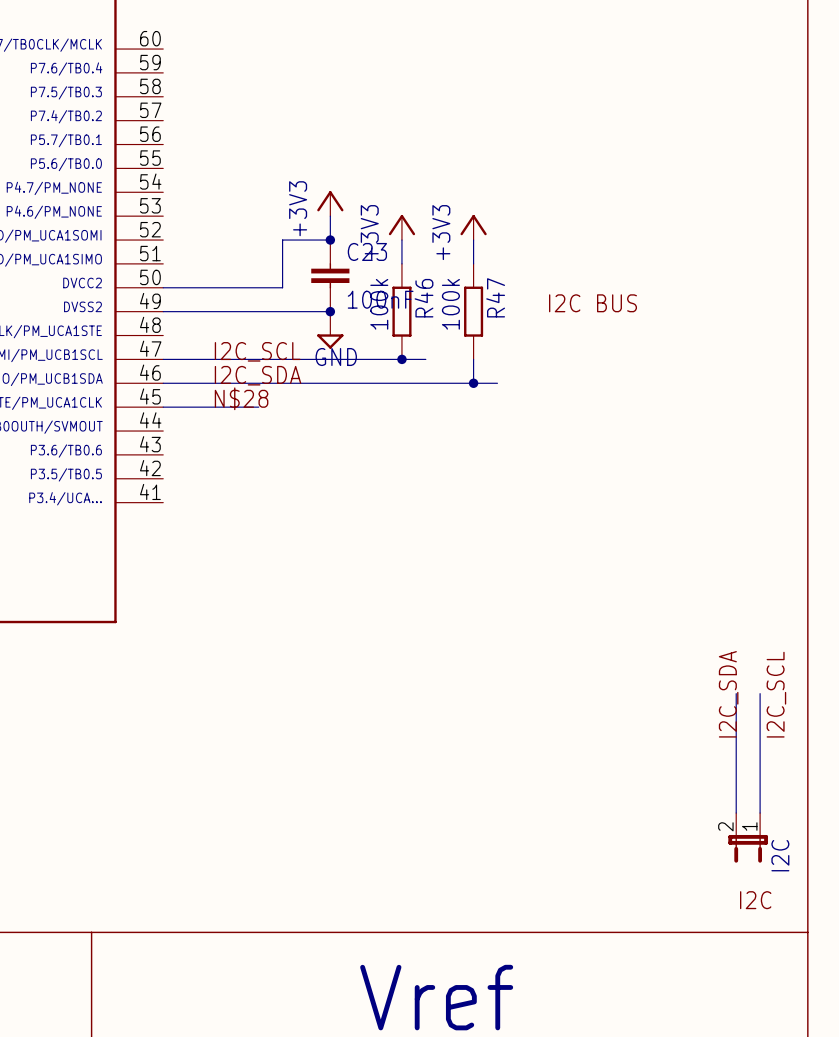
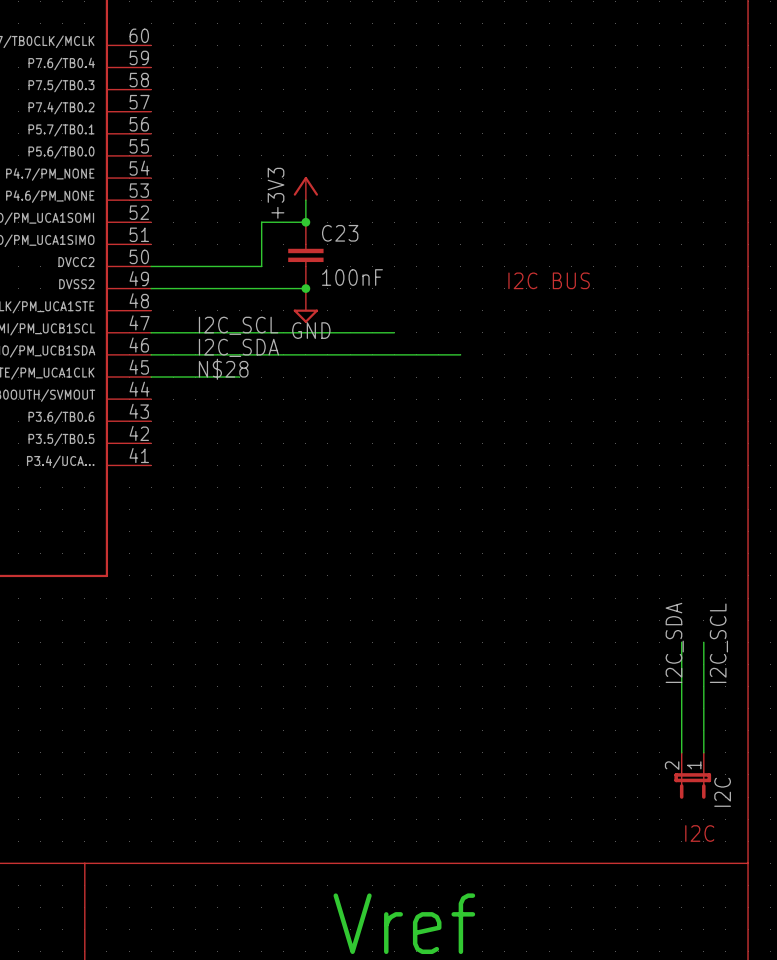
power symbol: +3V3 (401, 227) -> none
power symbol: +3V3 (473, 227) -> none
wire: (401, 240) (401, 263) -> none
wire: (473, 240) (473, 263) -> none
R46: 100k (401, 311) -> none
R47: 100k (473, 311) -> none
junction: (401, 359) -> none
wire: (473, 359) (473, 383) -> none
junction: (473, 383) -> none

